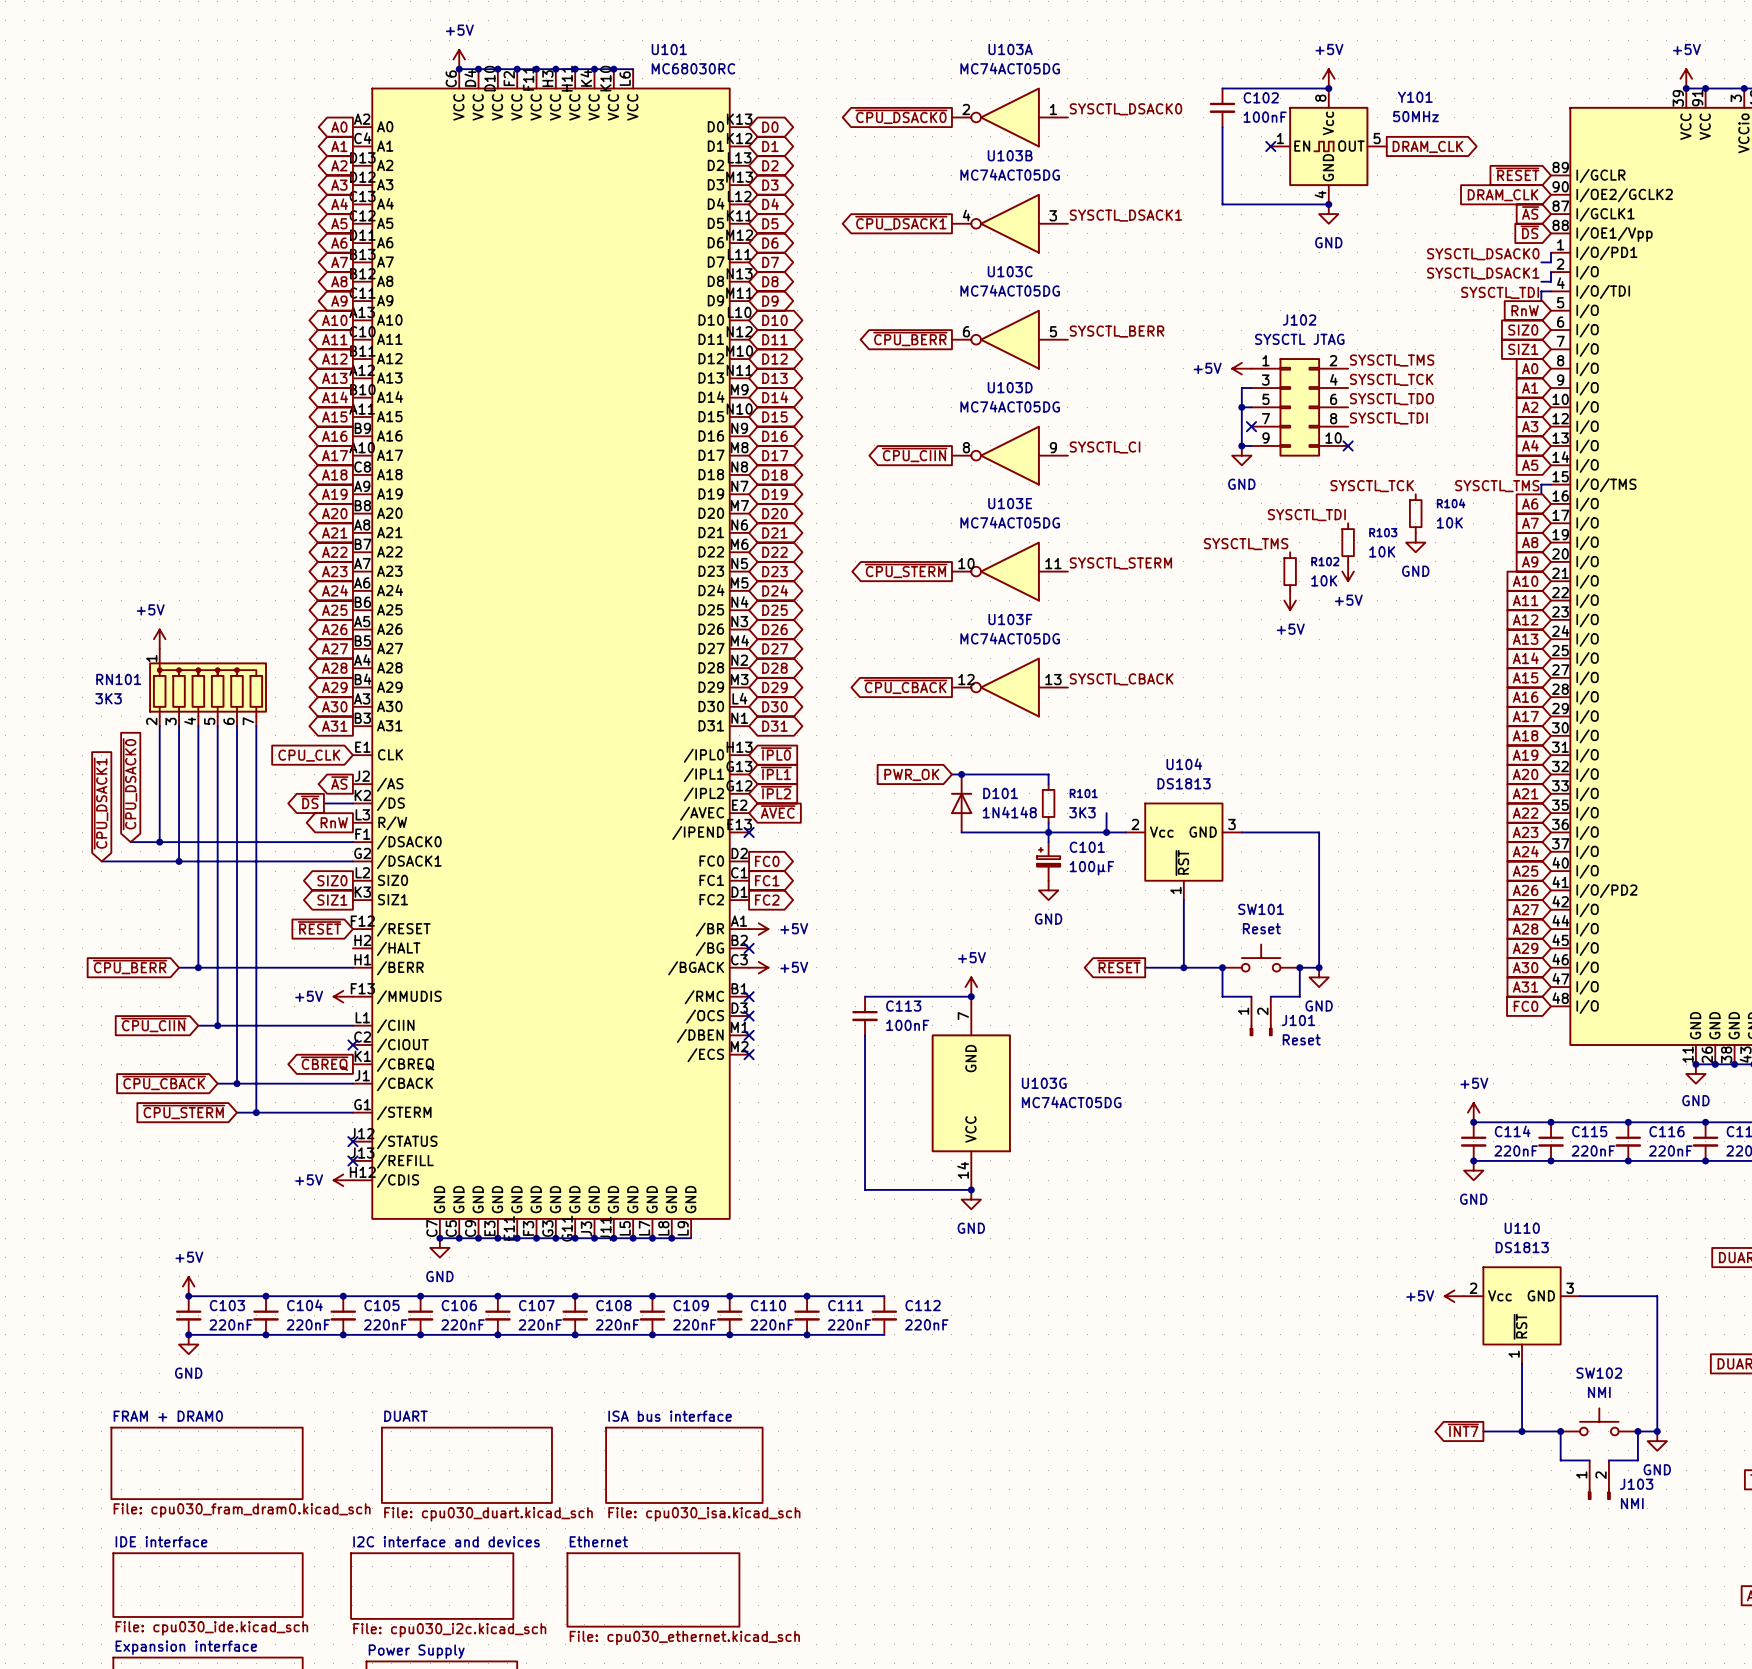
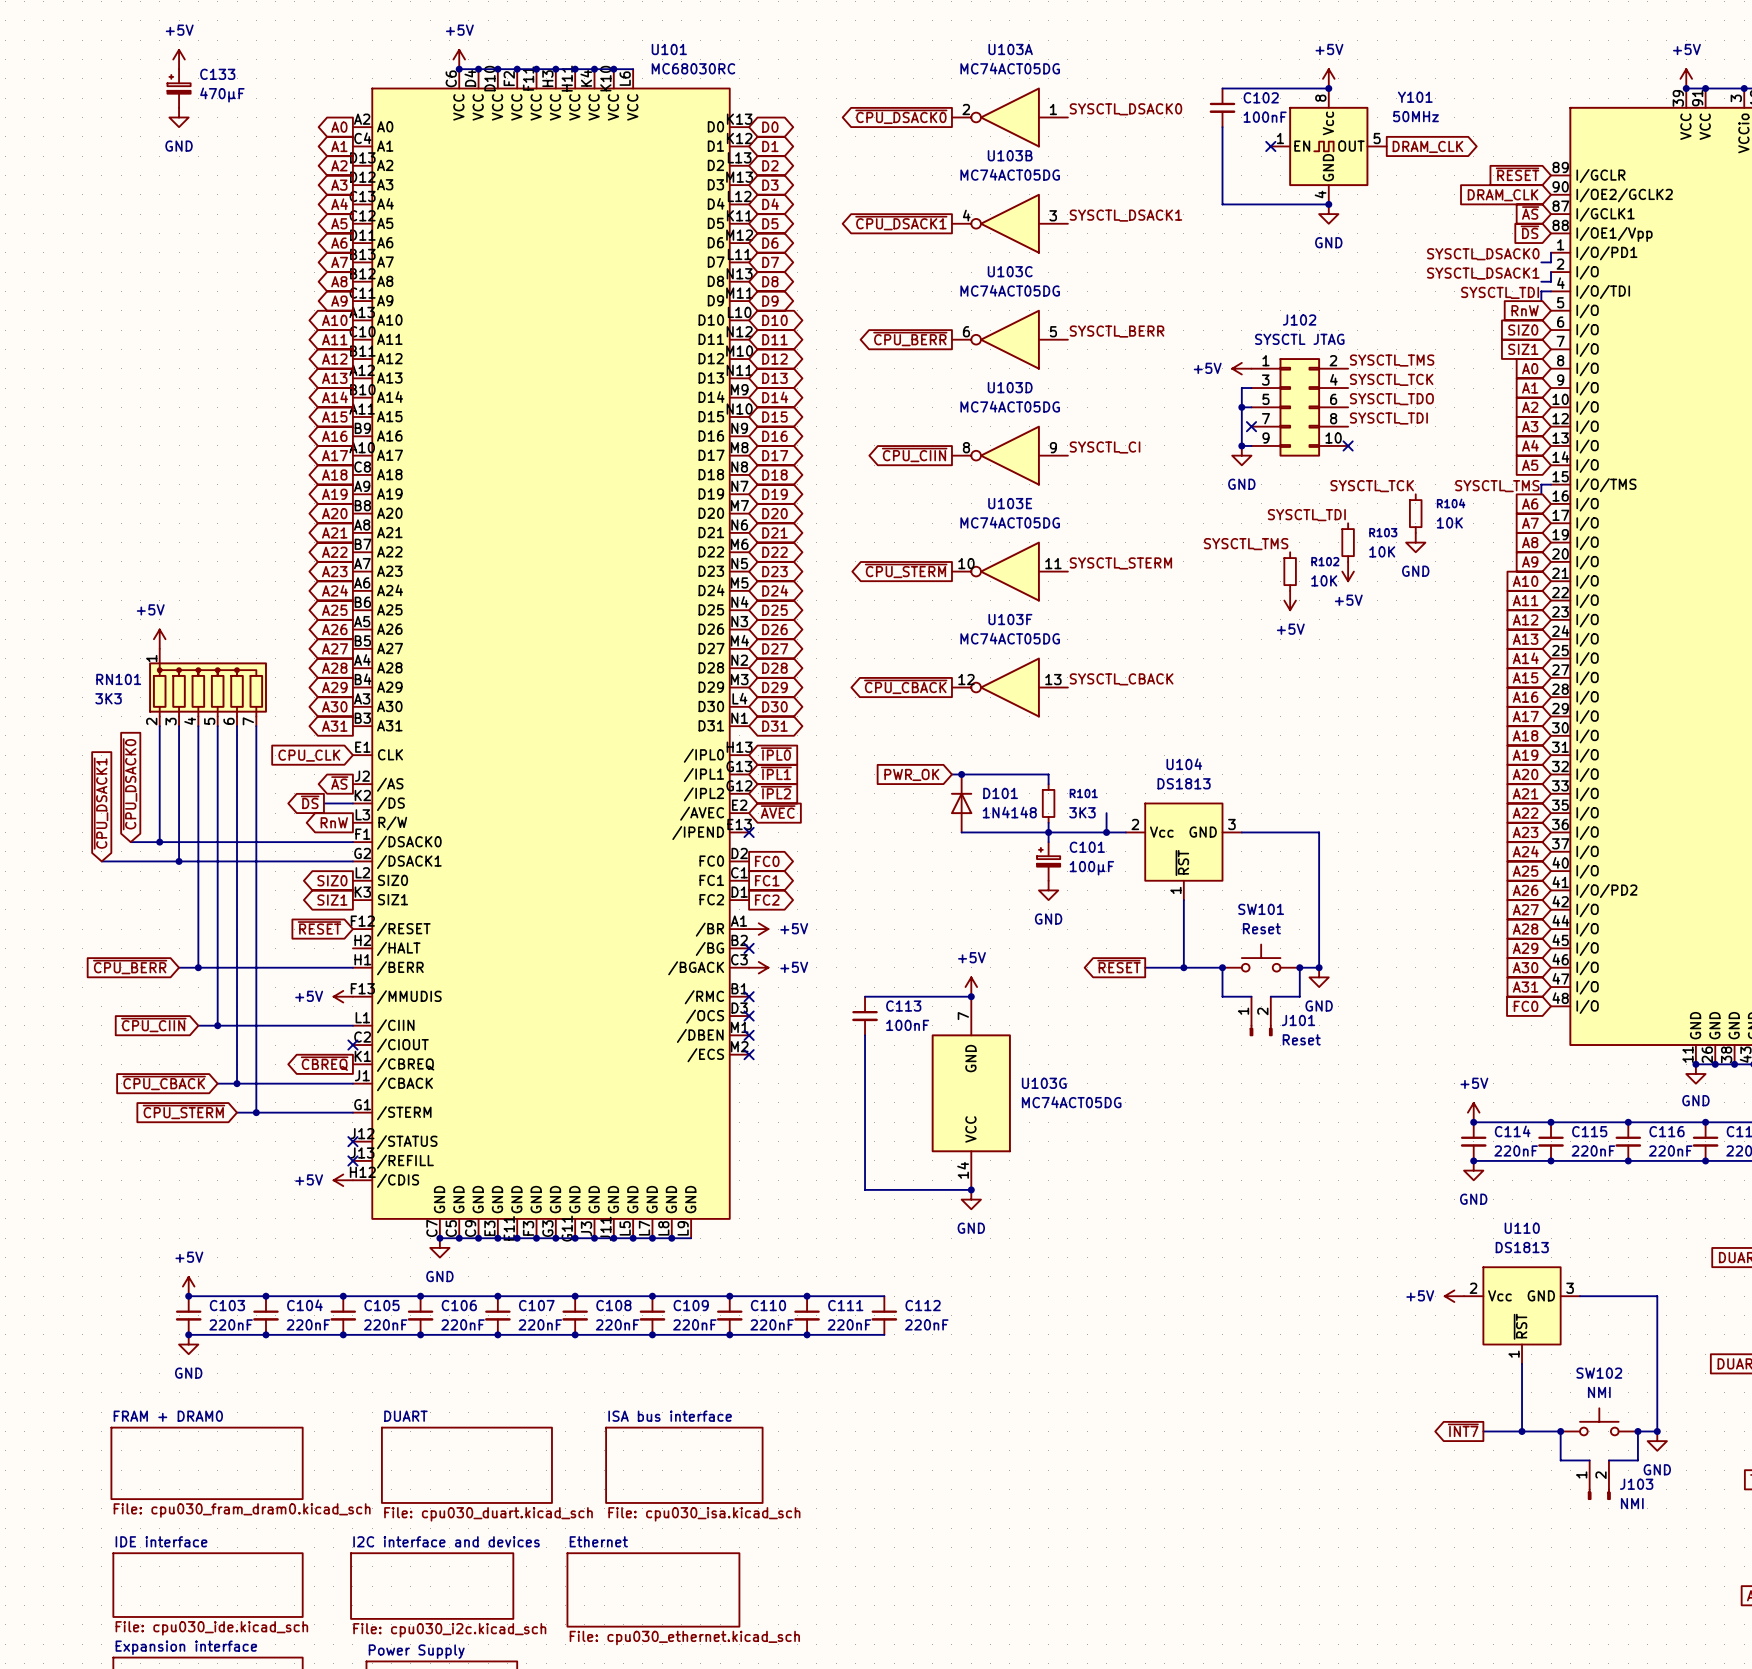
power symbol: none -> +5V (179, 59)
C133: none -> 470µF (179, 88)
power symbol: none -> GND (179, 117)

